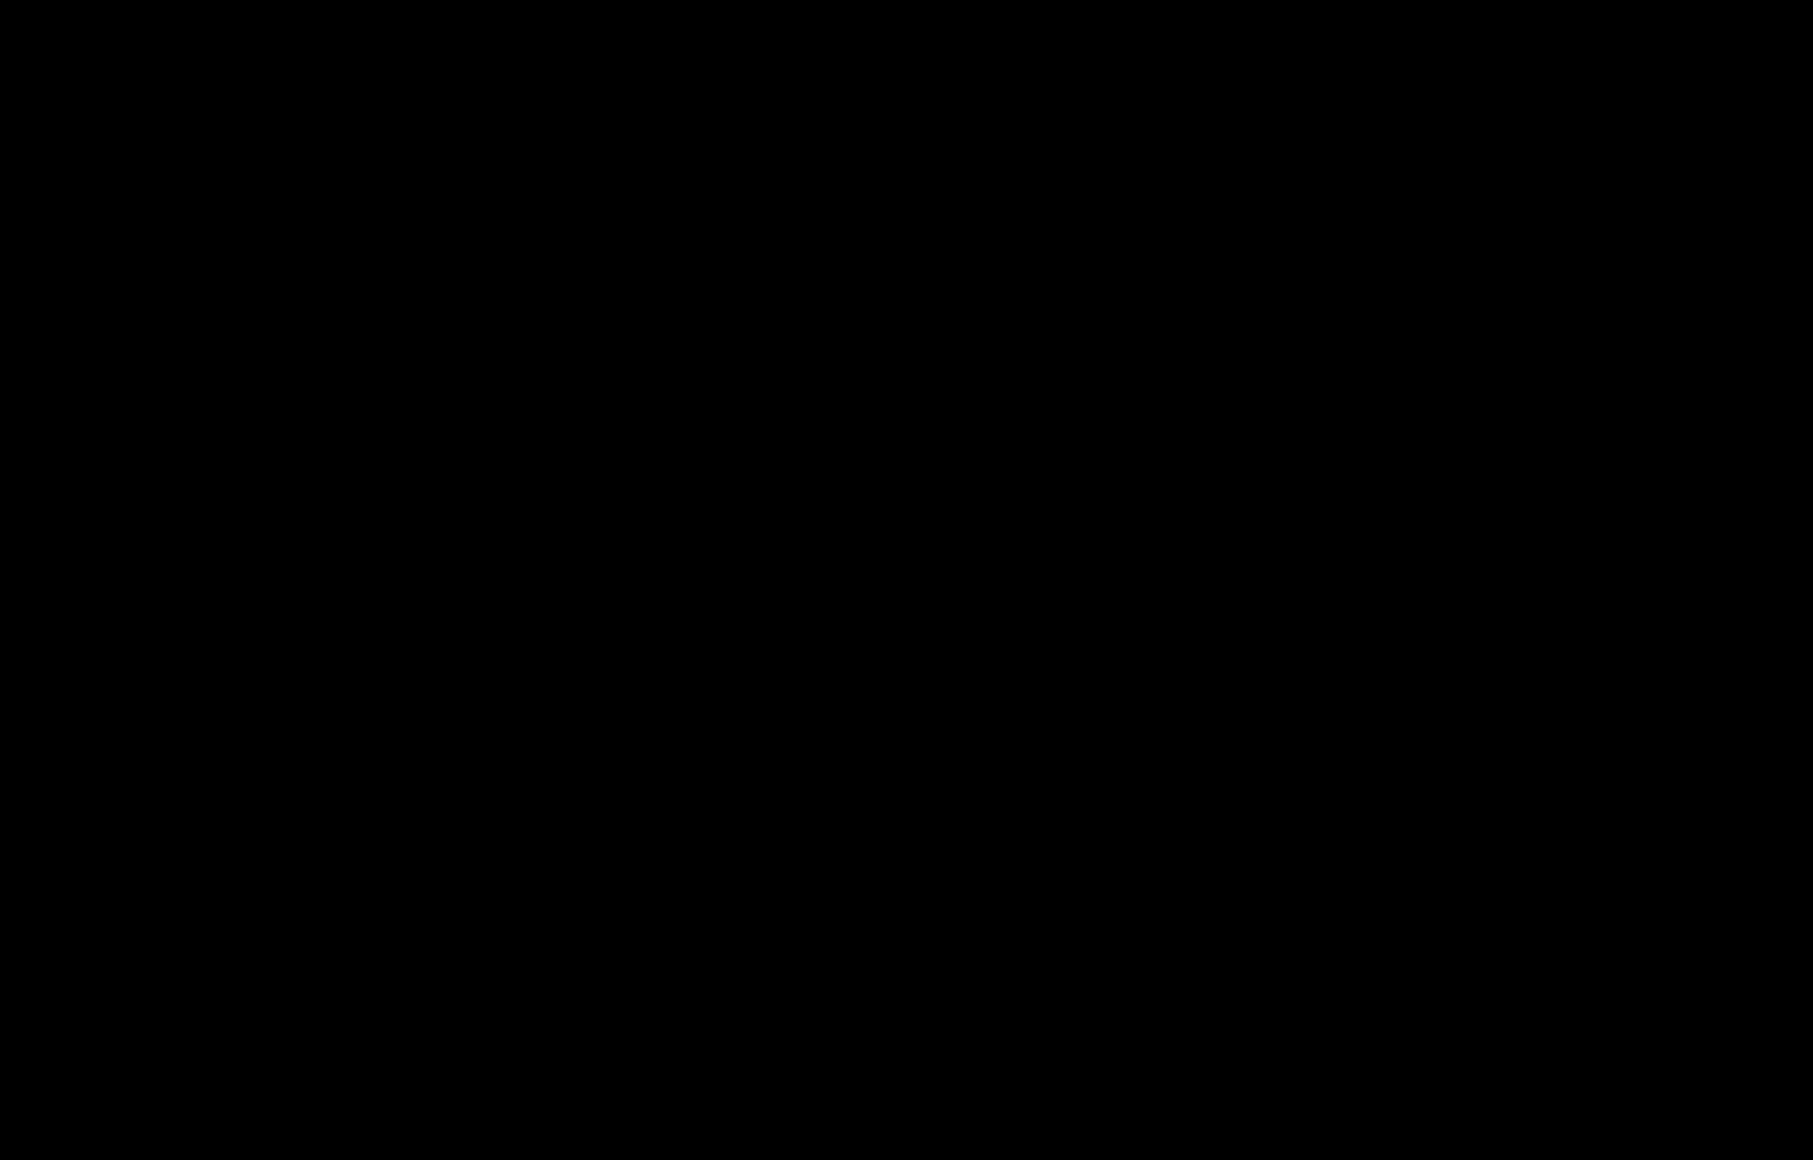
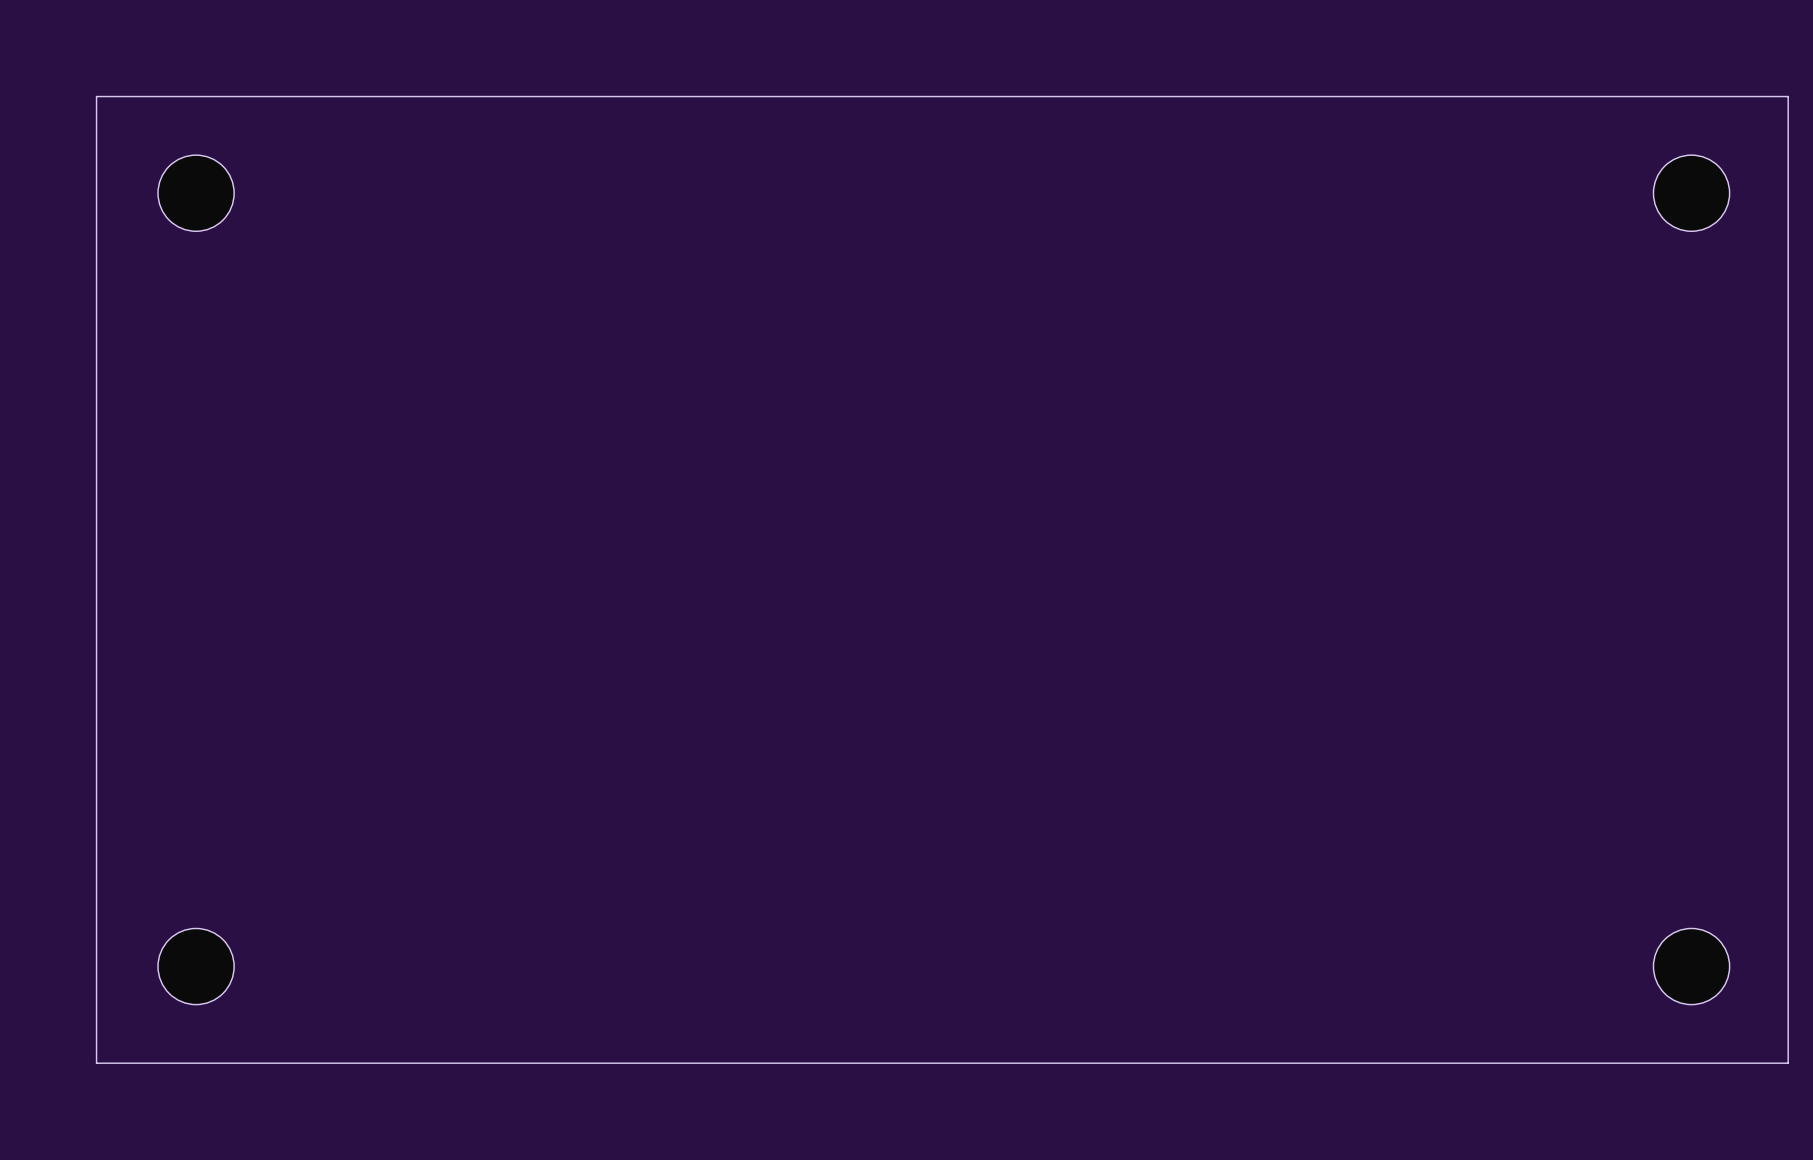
board edge: none -> (1788, 96) (96, 96) (96, 1063) (1788, 1063) (1788, 96)
part: none -> (196, 193)
part: none -> (1691, 193)
part: none -> (196, 966)
part: none -> (1691, 966)

